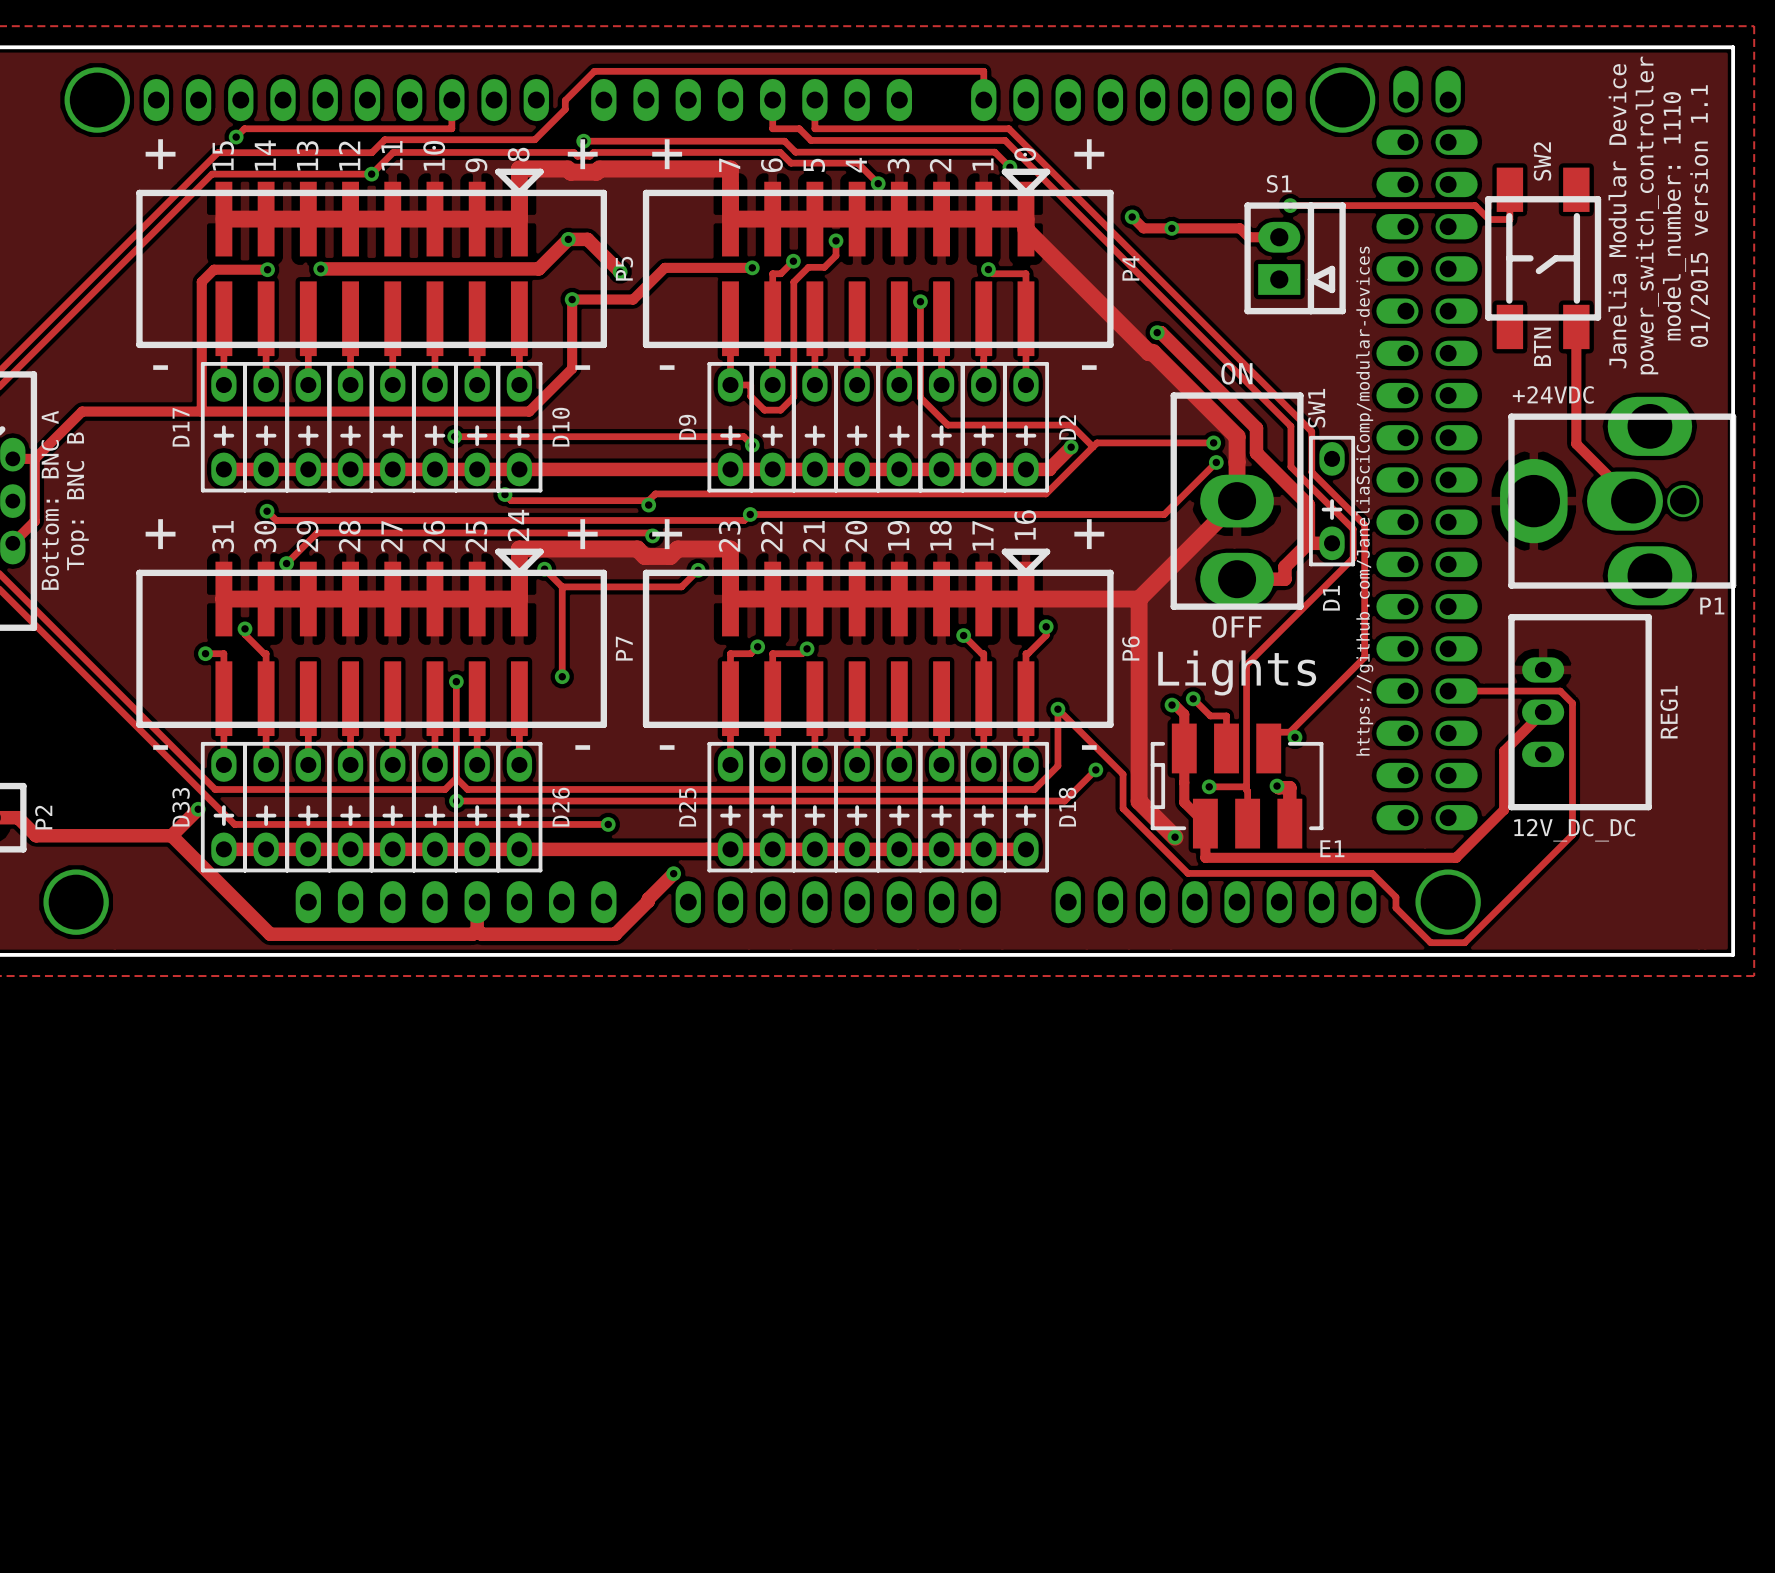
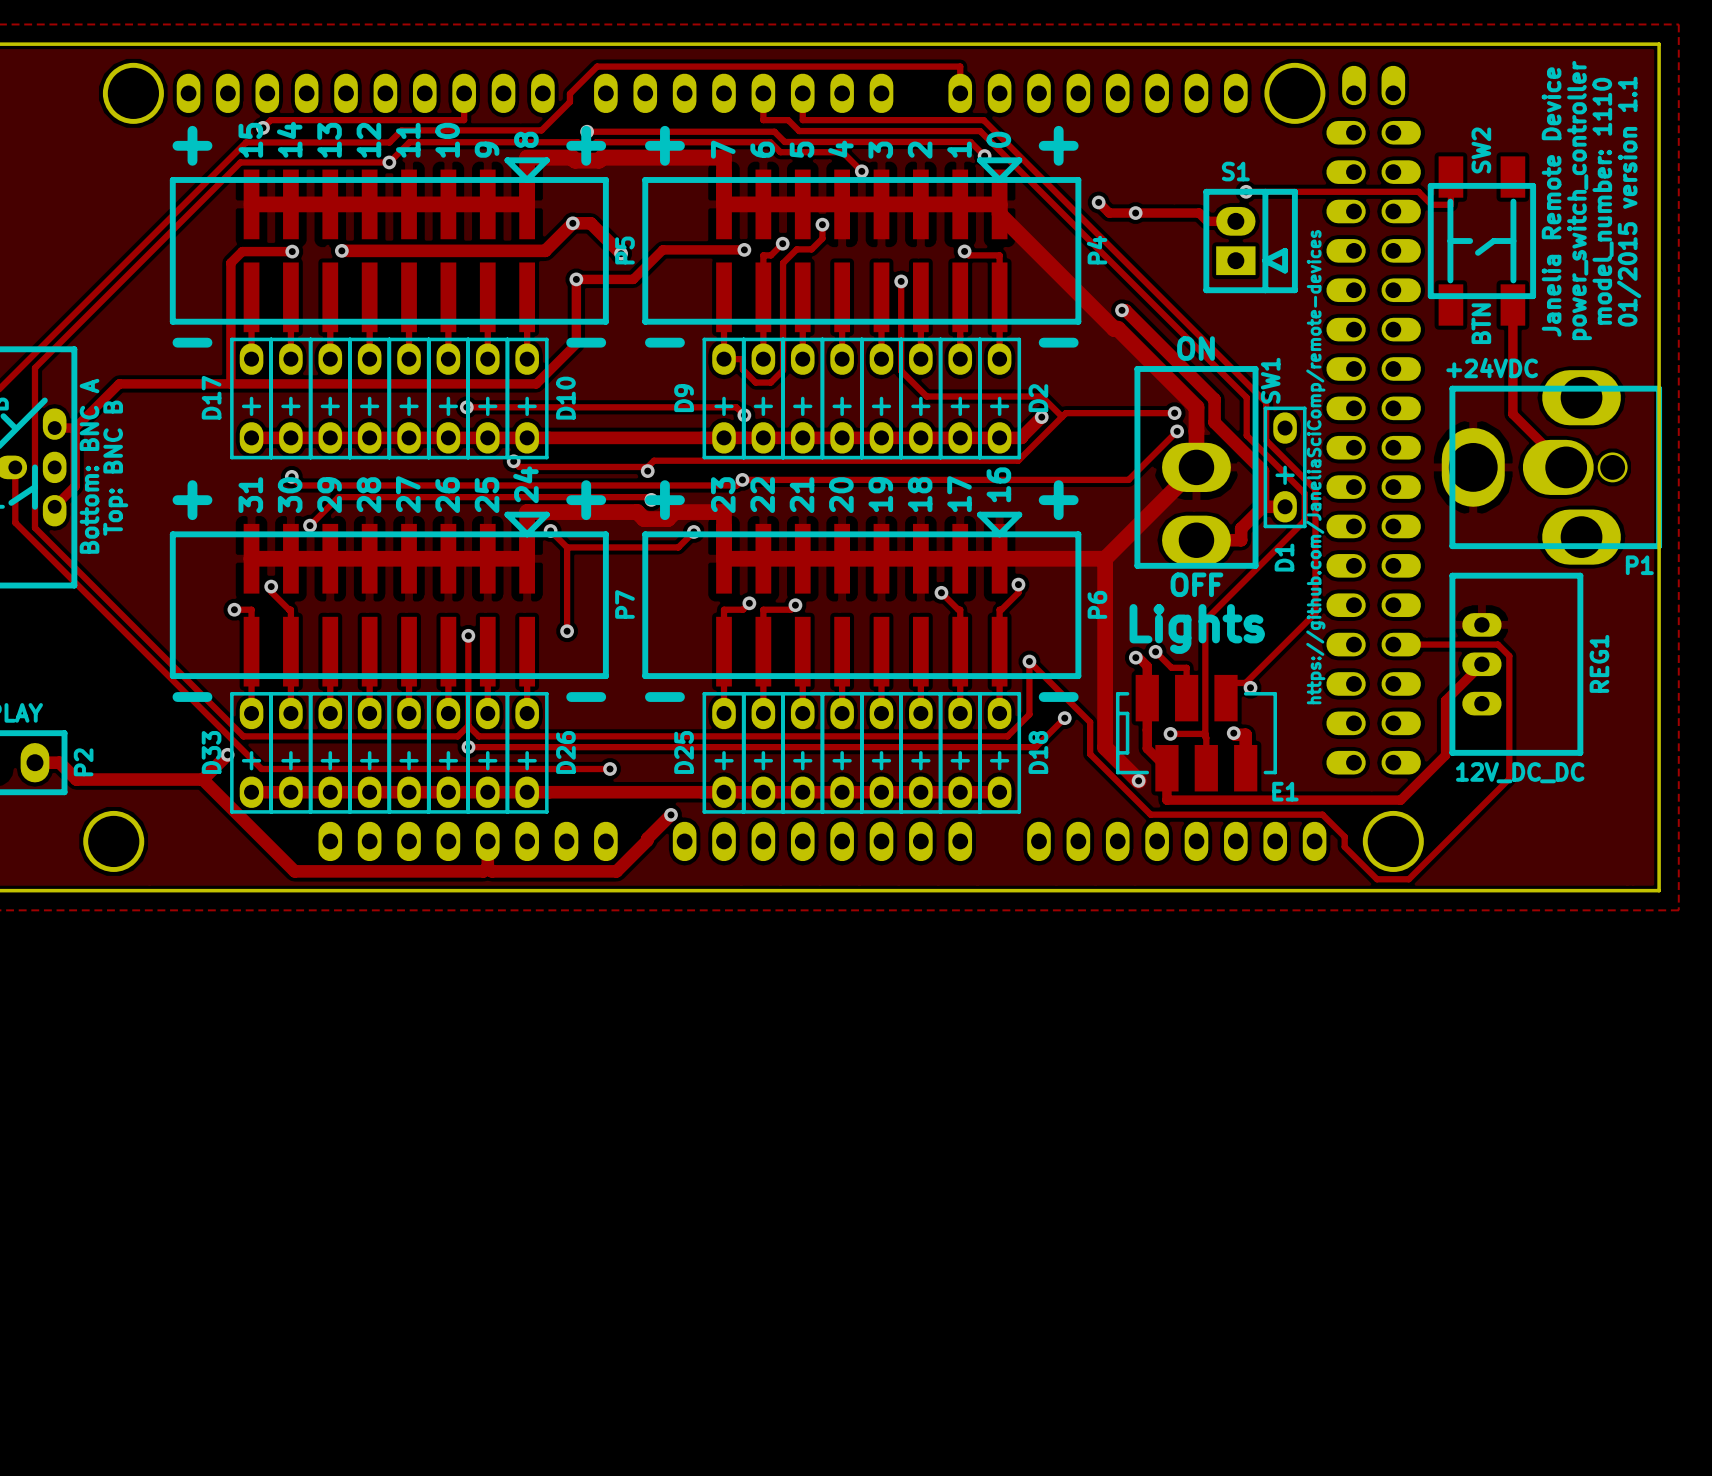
text: Janelia Modular Device (1617, 216) -> Janelia Remote Device (1551, 202)
text: https://github.com/JaneliaSciComp/modular-devices (1364, 501) -> https://github.com/JaneliaSciComp/remote-devices (1315, 467)

